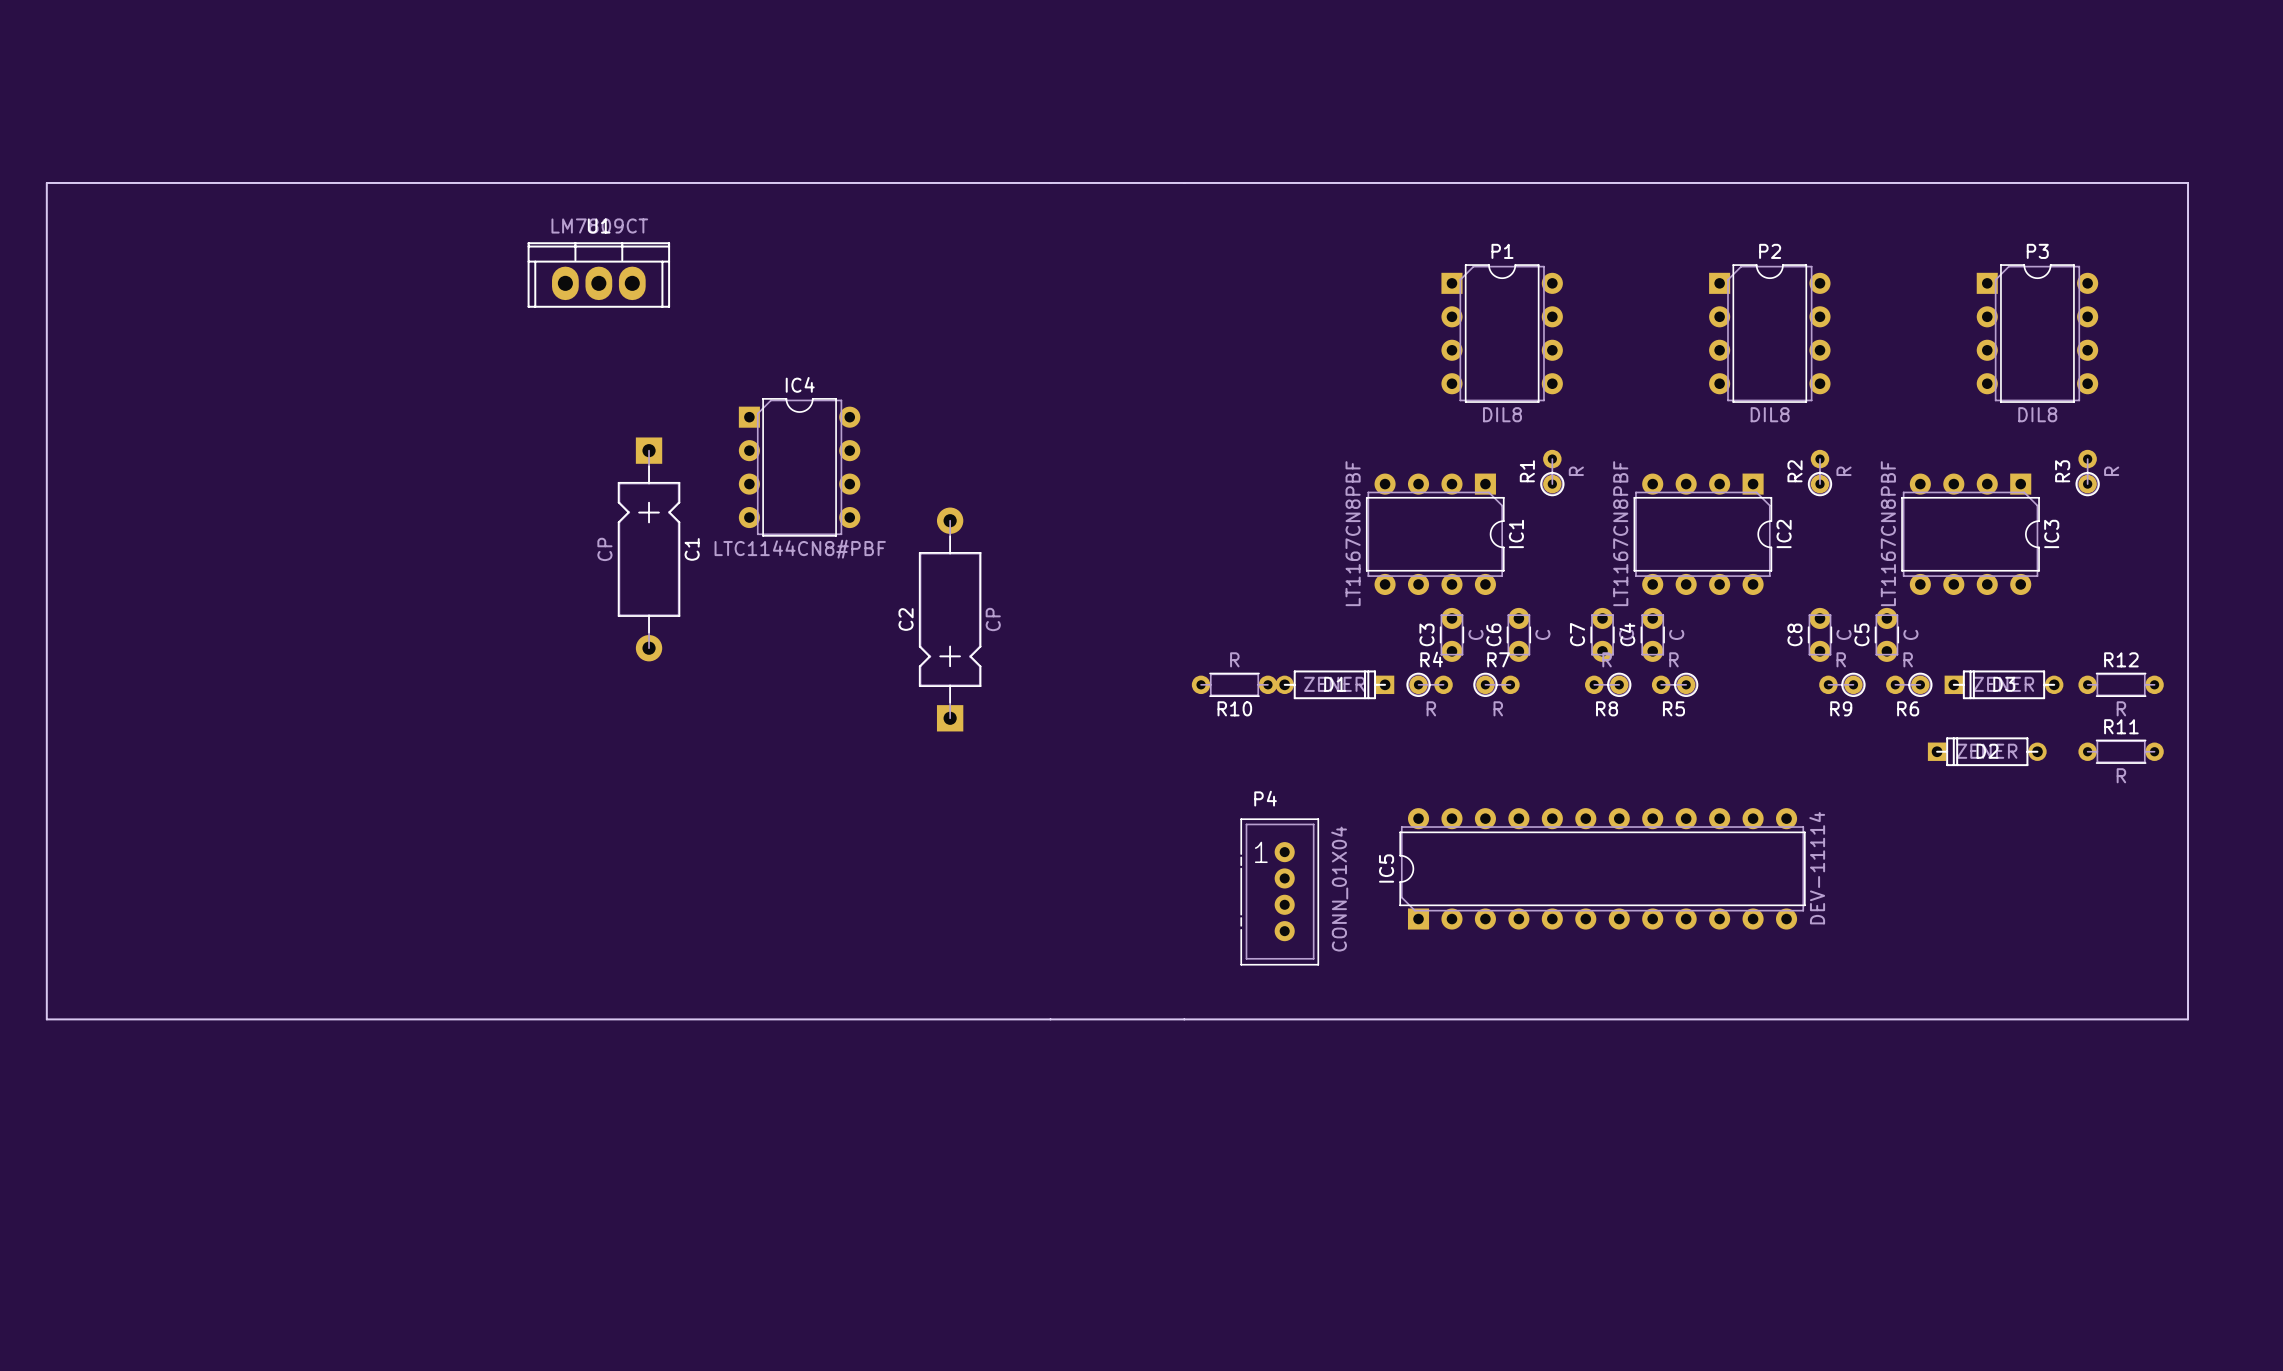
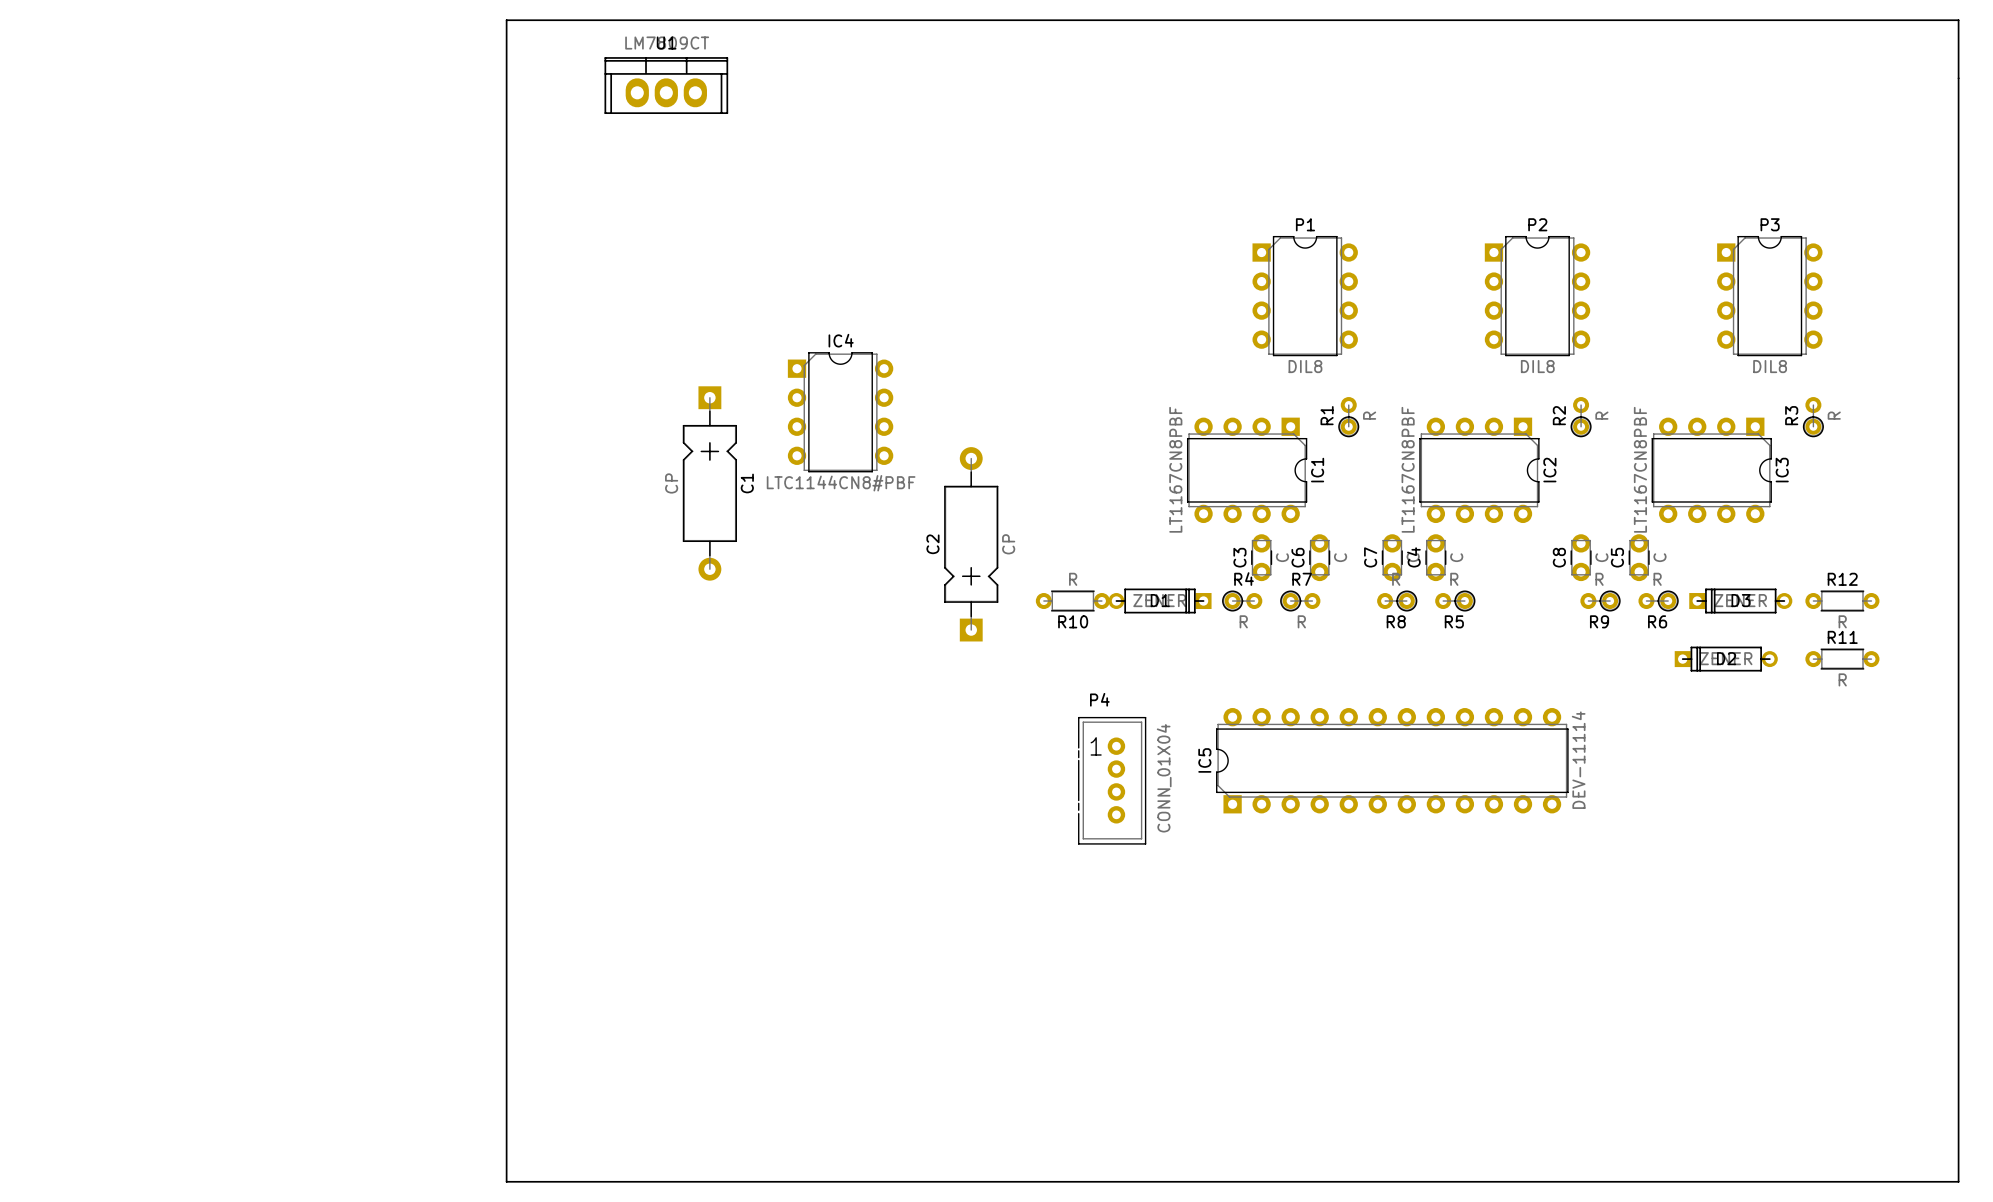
board edge: (46, 182) (2188, 182) (2188, 1019) (46, 1019) (46, 182) -> (506, 20) (506, 1181) (1958, 1181) (1958, 20) (506, 20)
U1 position: (598, 274) -> (666, 85)
IC4 position: (799, 467) -> (840, 412)
C1 position: (649, 549) -> (709, 483)
C2 position: (950, 619) -> (971, 544)

